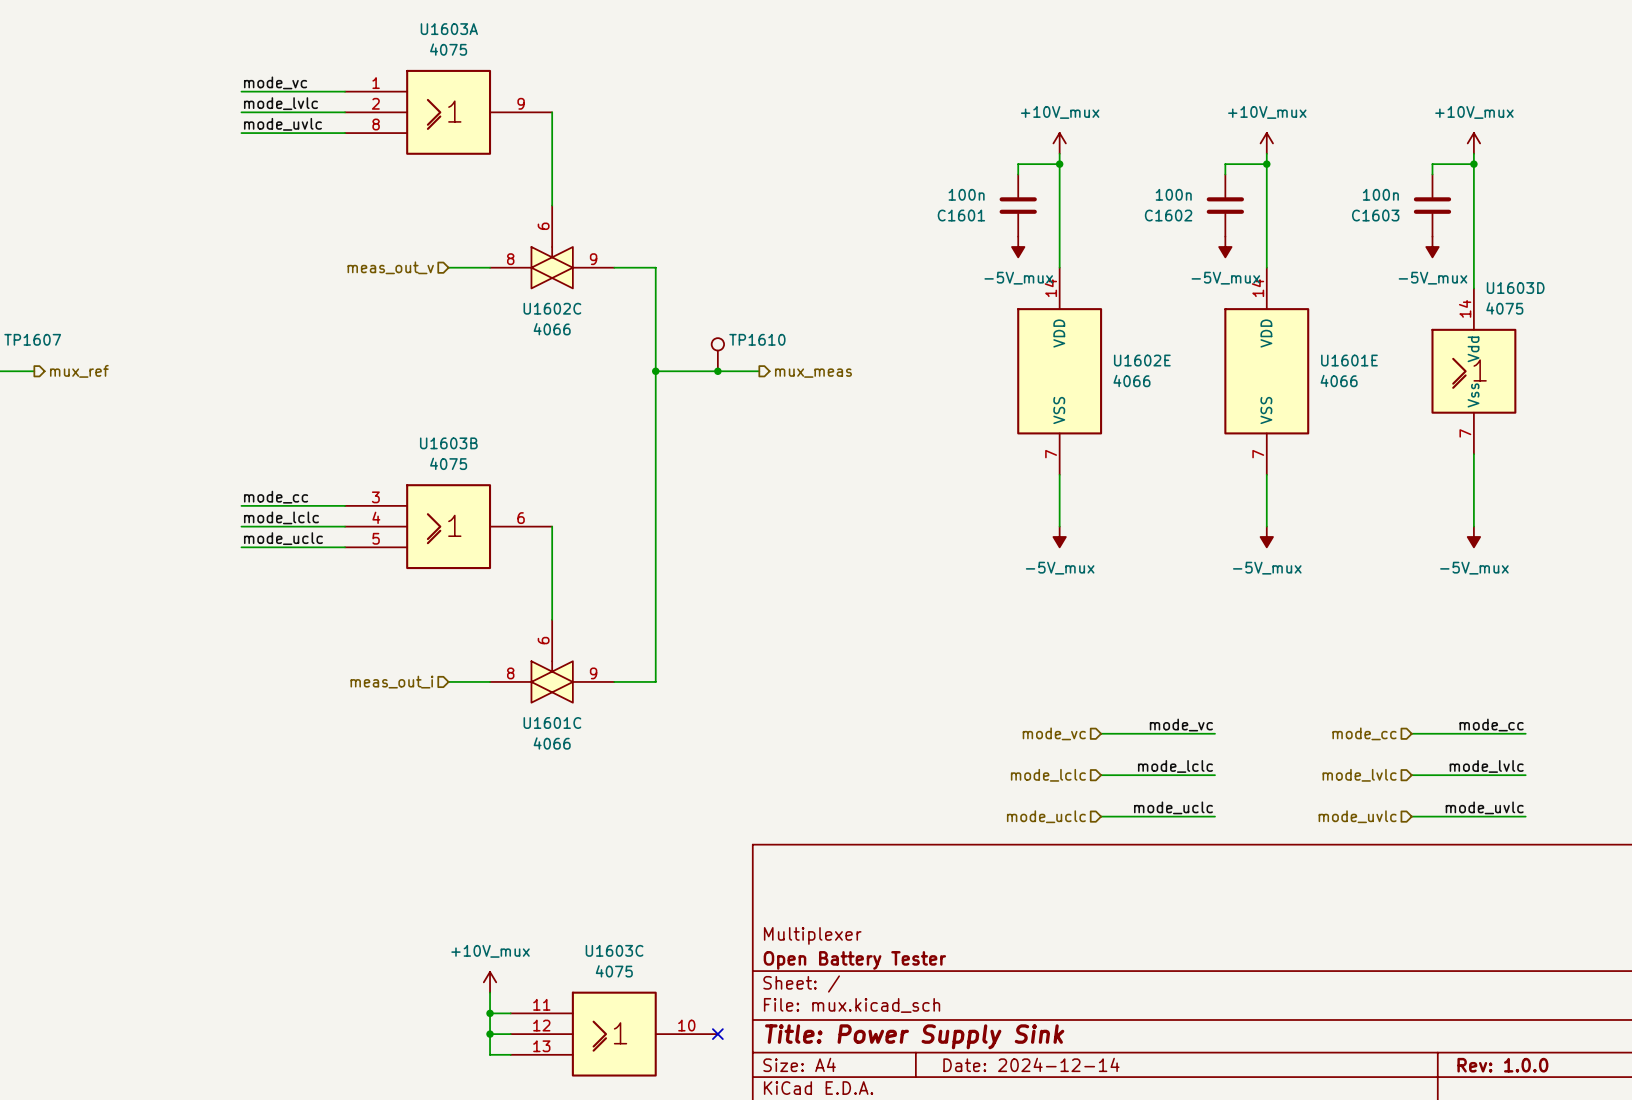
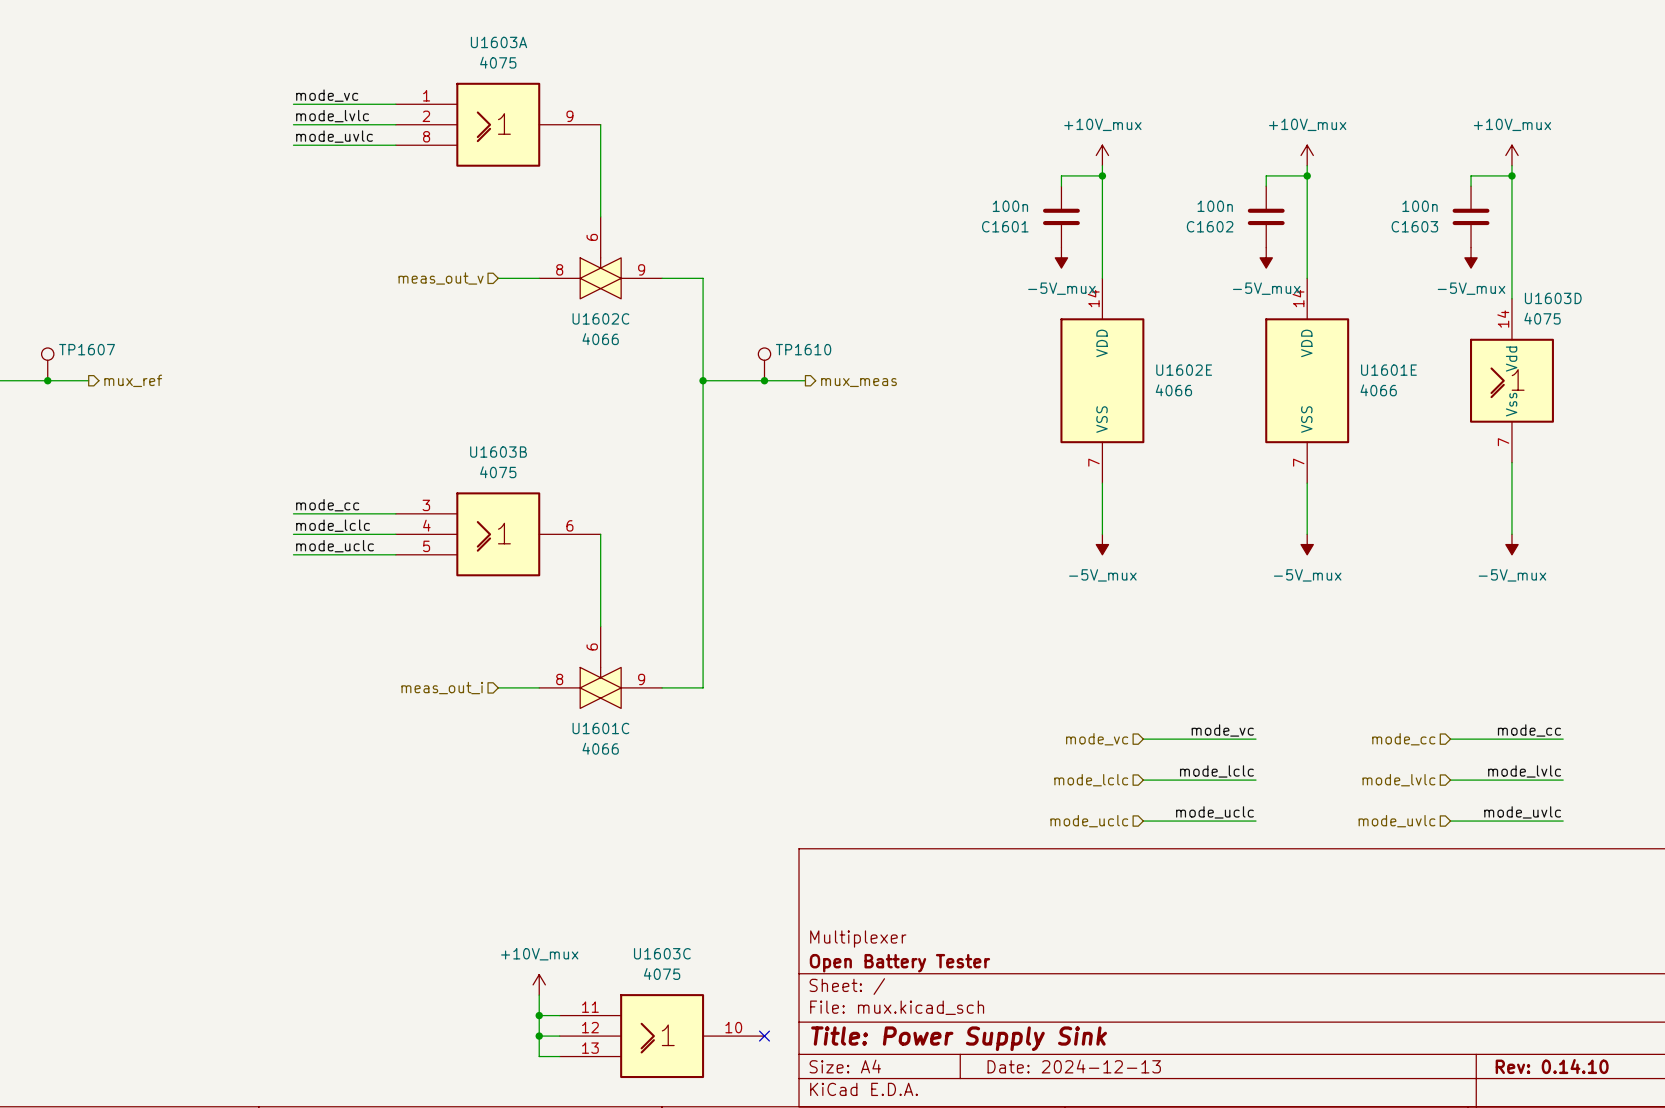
title block: Date: 2024-12-14 (1031, 1064) -> Date: 2024-12-13 (1074, 1066)
title block: Rev: 1.0.0 (1502, 1065) -> Rev: 0.14.10 (1552, 1066)

